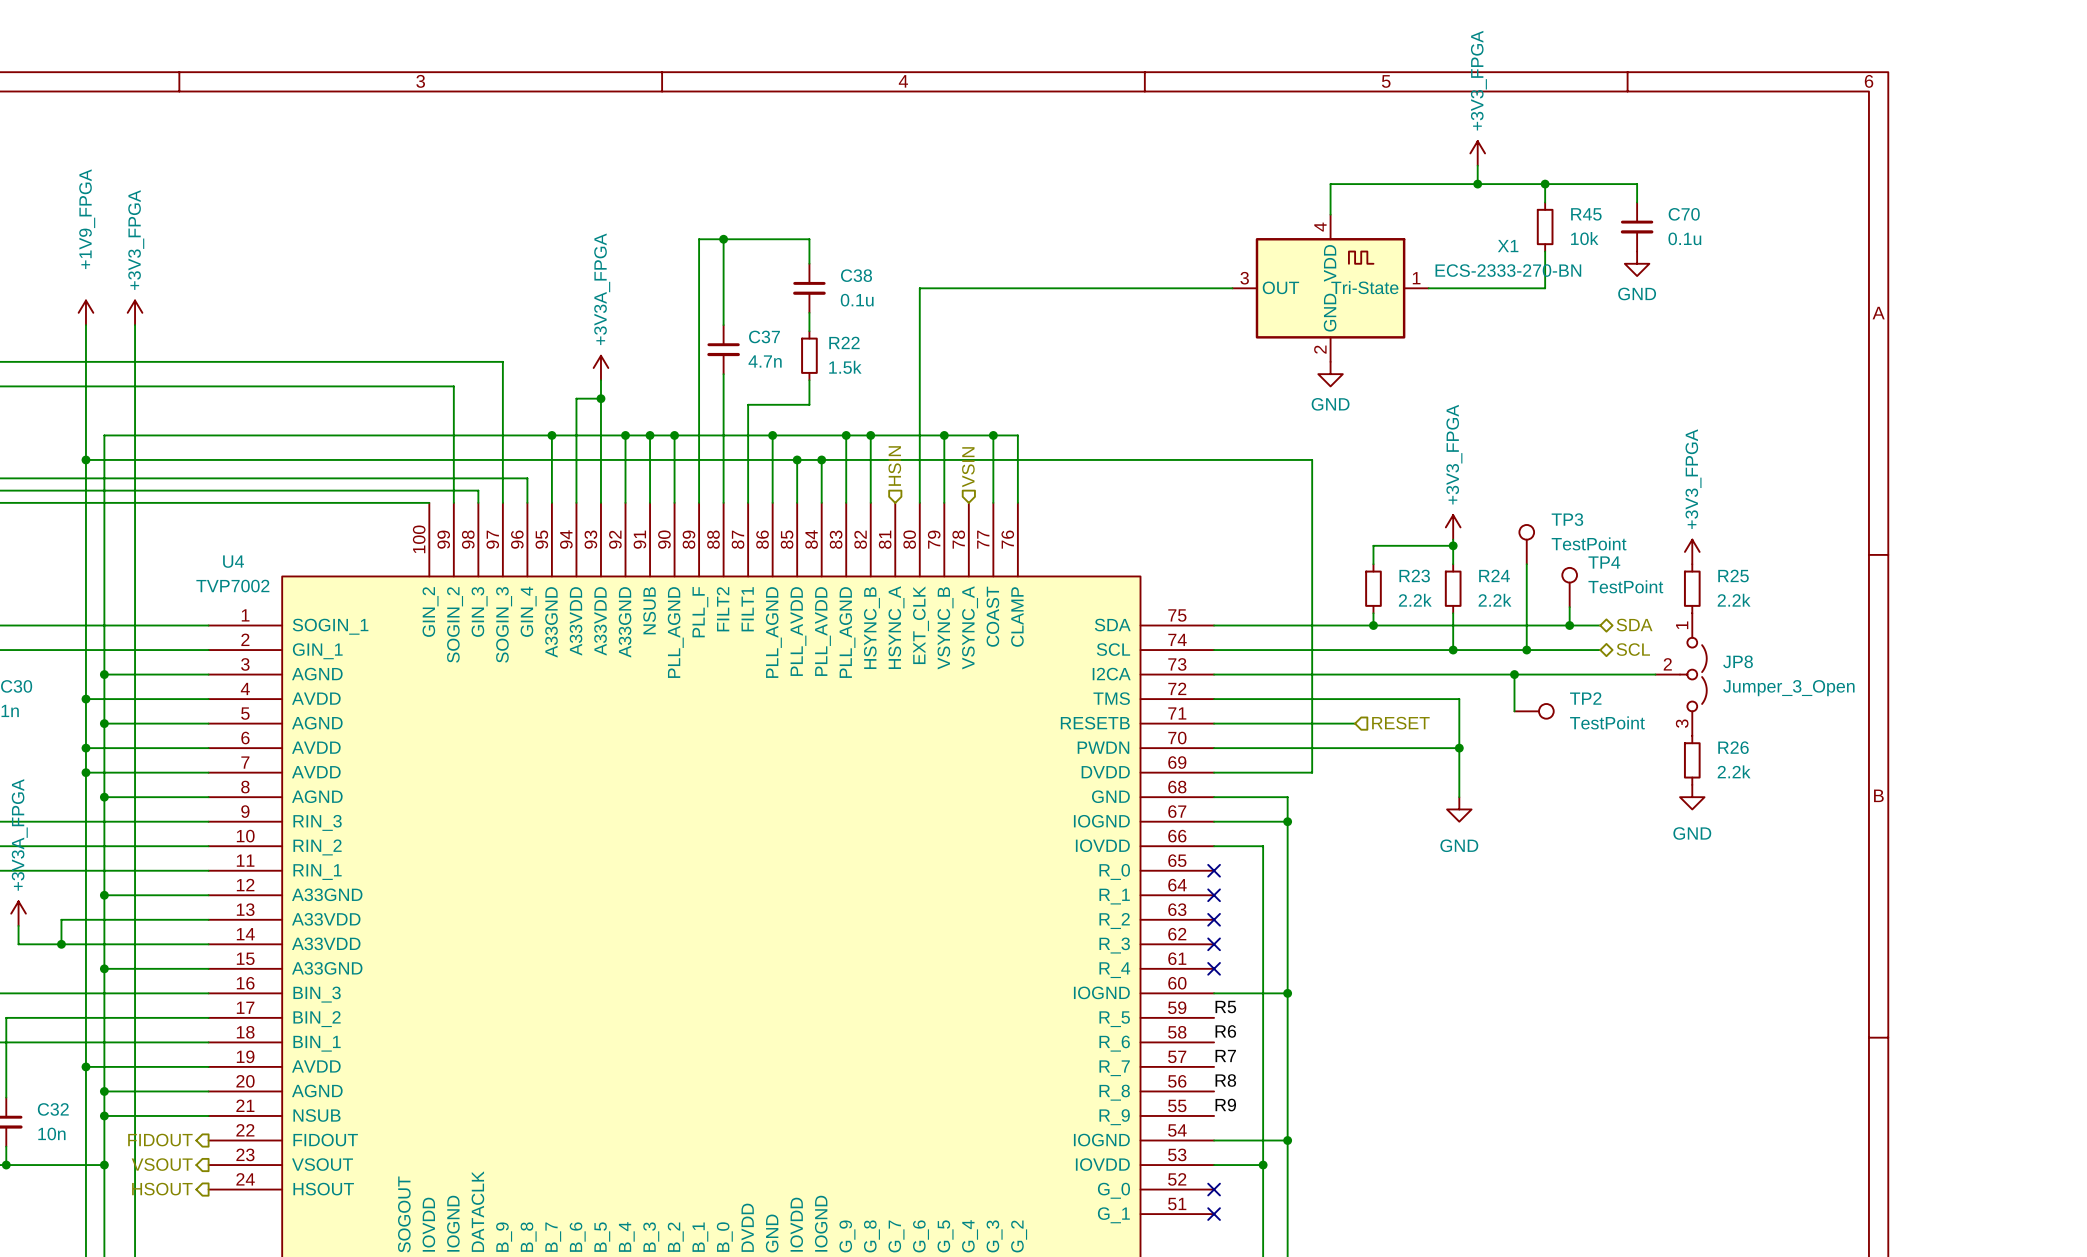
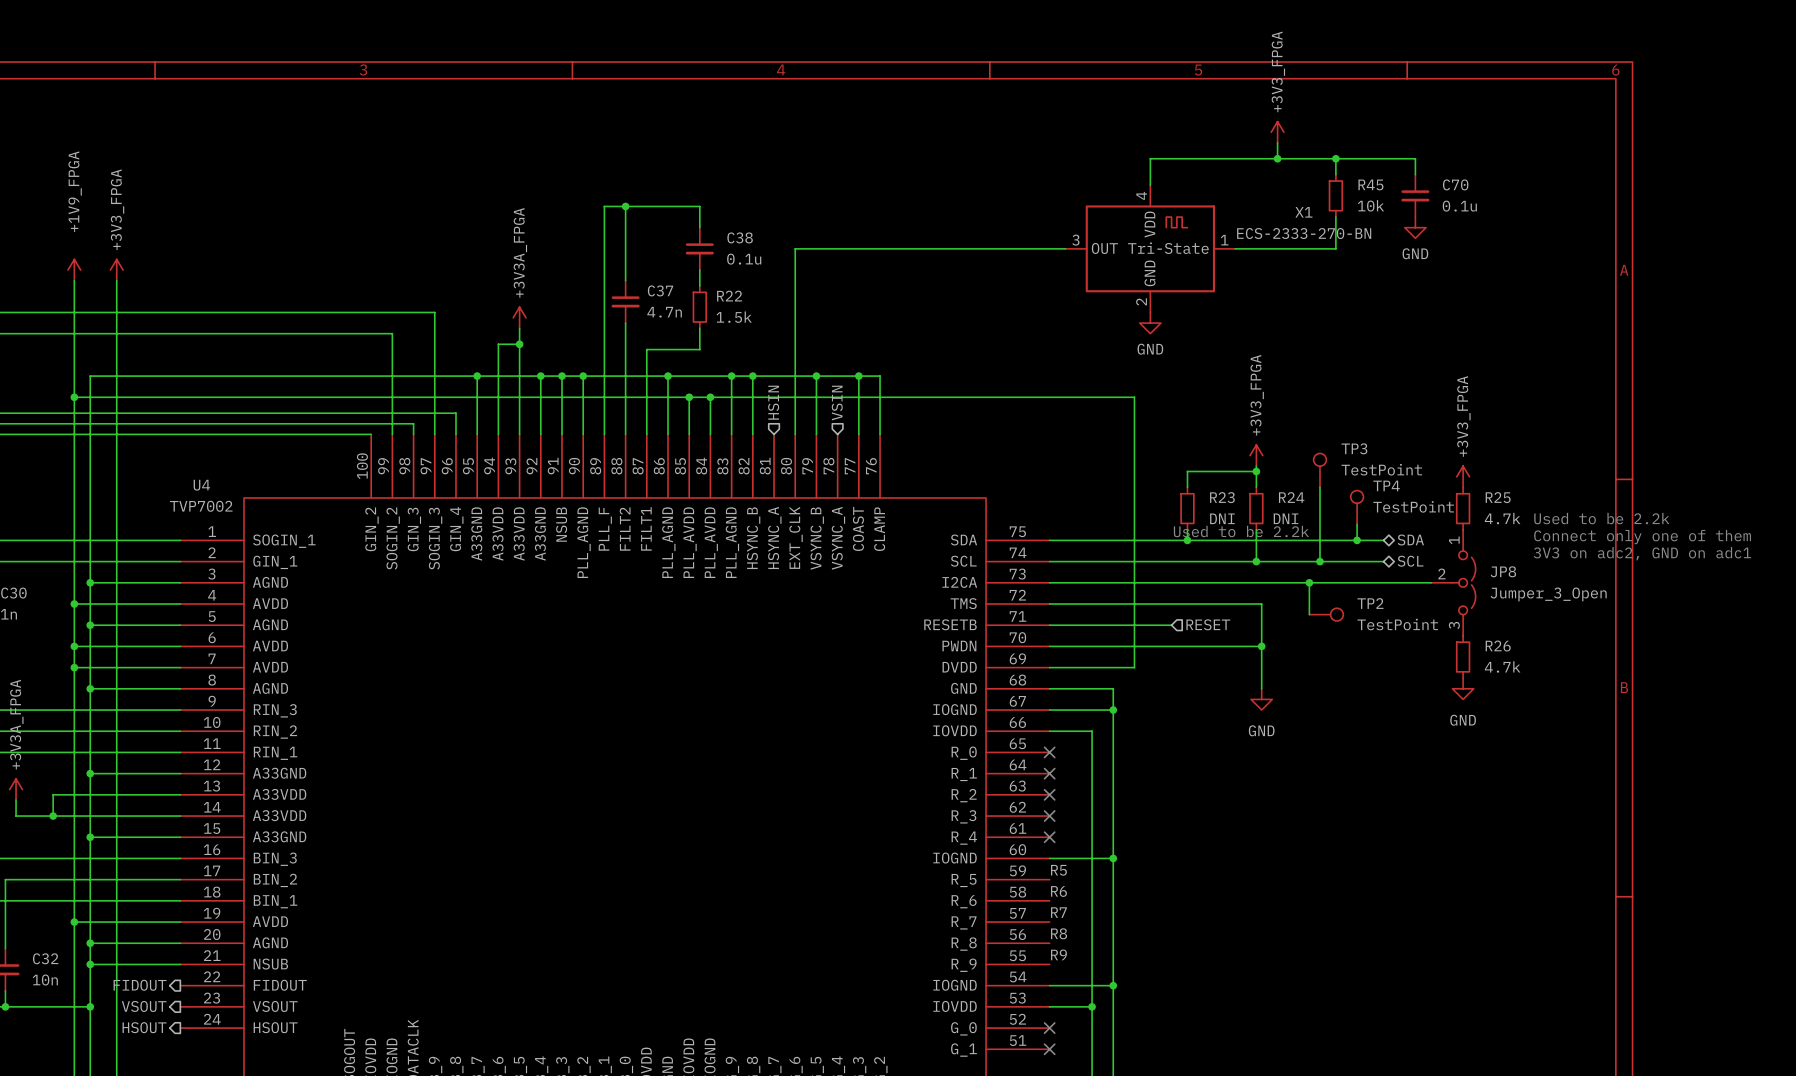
R23 value: 2.2k (1415, 600) -> DNI (1222, 518)
R24 value: 2.2k (1495, 600) -> DNI (1286, 518)
R25 value: 2.2k (1734, 600) -> 4.7k (1502, 518)
text: none -> Used to be 2.2k (1601, 518)
text: none -> Used to be 2.2k (1241, 531)
text: none -> Connect only one of them (1642, 537)
text: none -> 3V3 on adc2, GND on adc1 (1642, 553)
R26 value: 2.2k (1734, 771) -> 4.7k (1502, 666)

